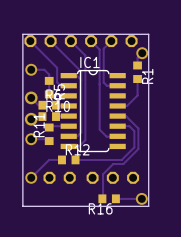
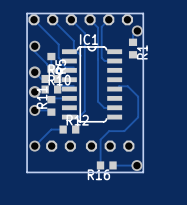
track: (73, 63) (81, 71) (81, 132) (77, 136) (68, 136) -> (73, 40) (74, 49)
track: (31, 69) (44, 69) (49, 74) (49, 80) -> none
track: none -> (34, 51) (47, 65)
track: (137, 79) (137, 95) (127, 105) (117, 105) -> none
track: none -> (59, 65) (73, 67)
track: none -> (73, 86) (59, 87)
track: none -> (119, 86) (127, 86) (138, 96) (138, 117) (124, 131) (109, 131) (100, 139) (100, 165)
track: (117, 116) (126, 116) (138, 128) (138, 149) (123, 164) (113, 164) (103, 174) (103, 198) -> none
track: (117, 126) (129, 126) (134, 131) (134, 147) (121, 160) (75, 160) -> none

